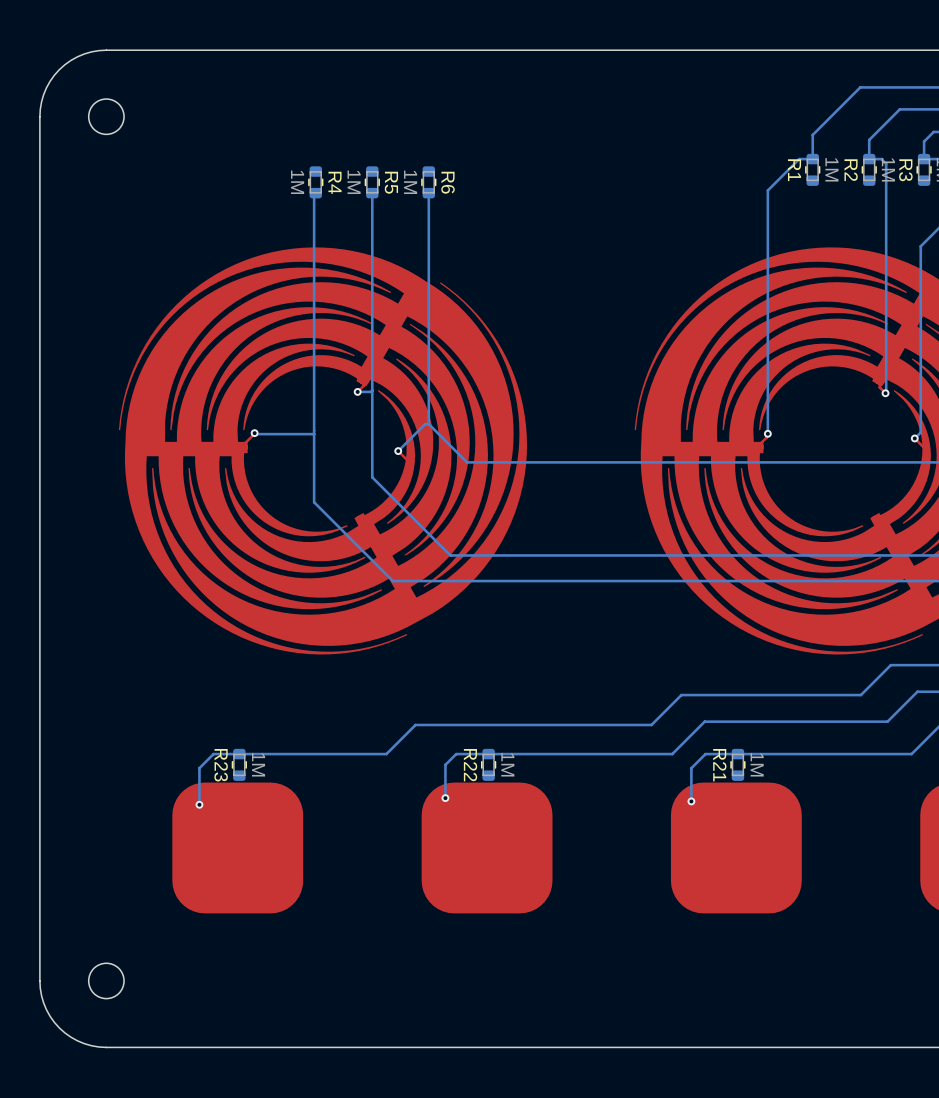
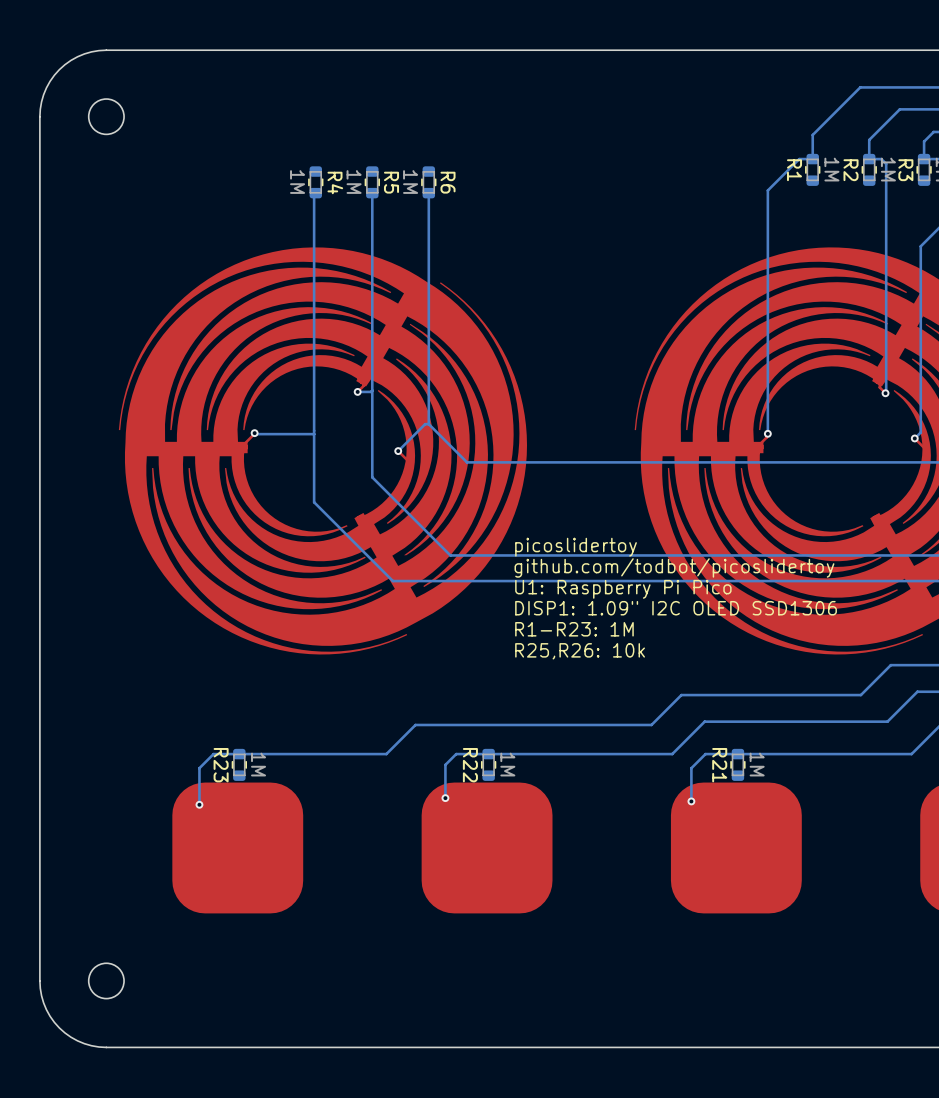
text: none -> picoslidertoy (576, 547)
text: none -> github.com/todbot/picoslidertoy (674, 567)
text: none -> U1: Raspberry Pi Pico (623, 589)
text: none -> DISP1: 1.09" I2C OLED SSD1306 (676, 608)
text: none -> R1-R23: 1M (574, 629)
text: none -> R25,R26: 10k (580, 651)

